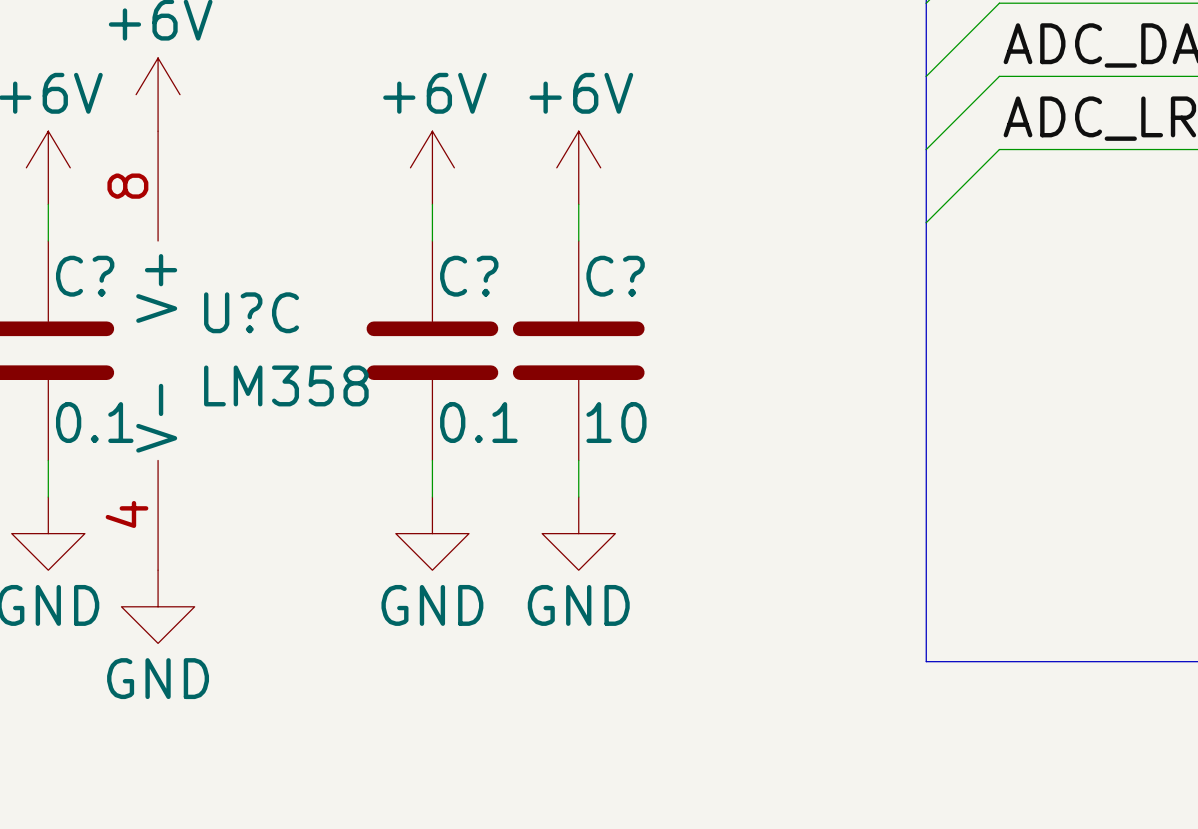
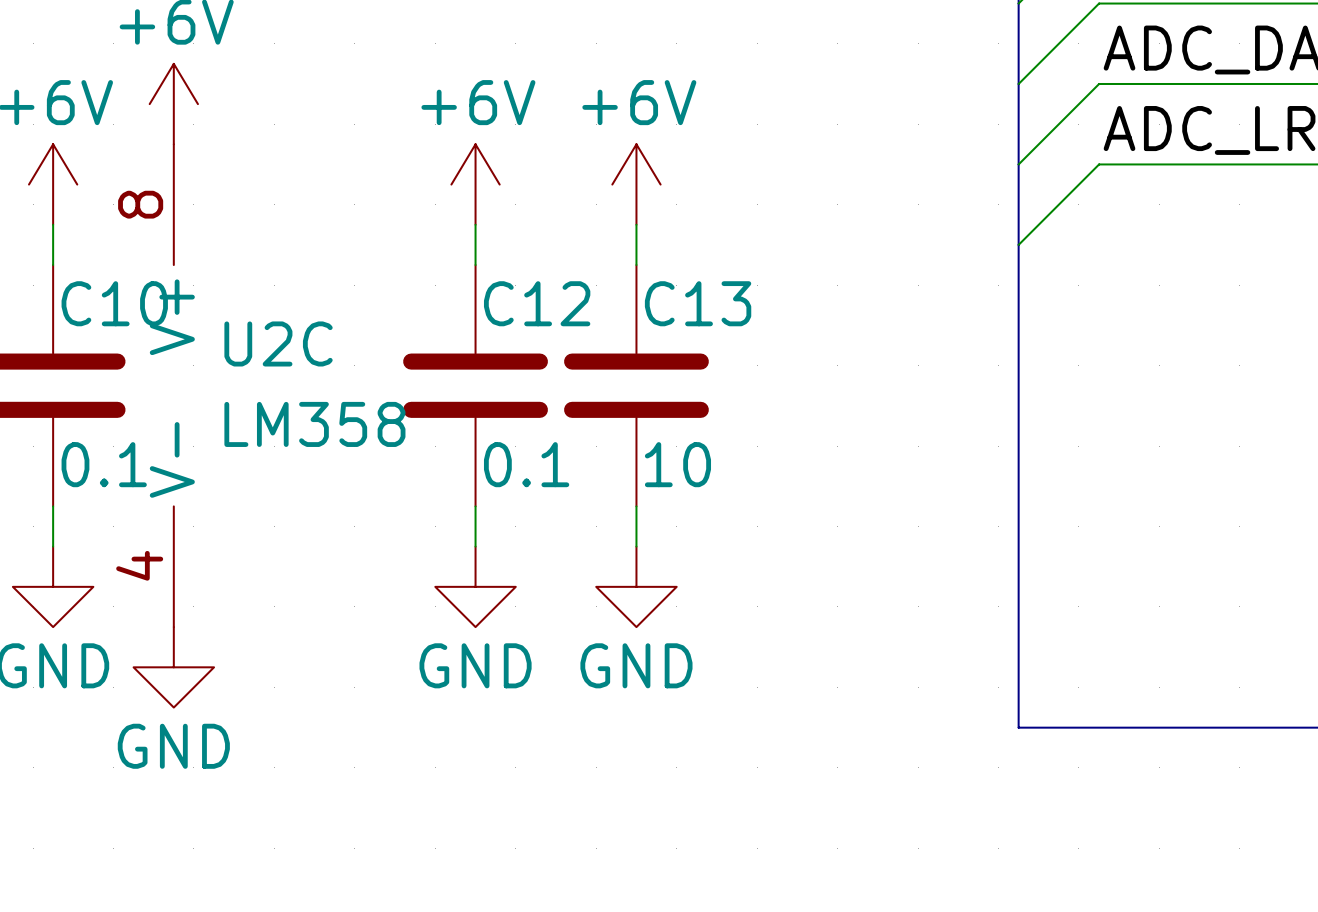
C? name: C? (85, 276) -> C10 (114, 303)
C? name: C? (469, 276) -> C12 (537, 303)
C? name: C? (615, 276) -> C13 (698, 303)
U?C name: U?C (251, 312) -> U2C (278, 343)

